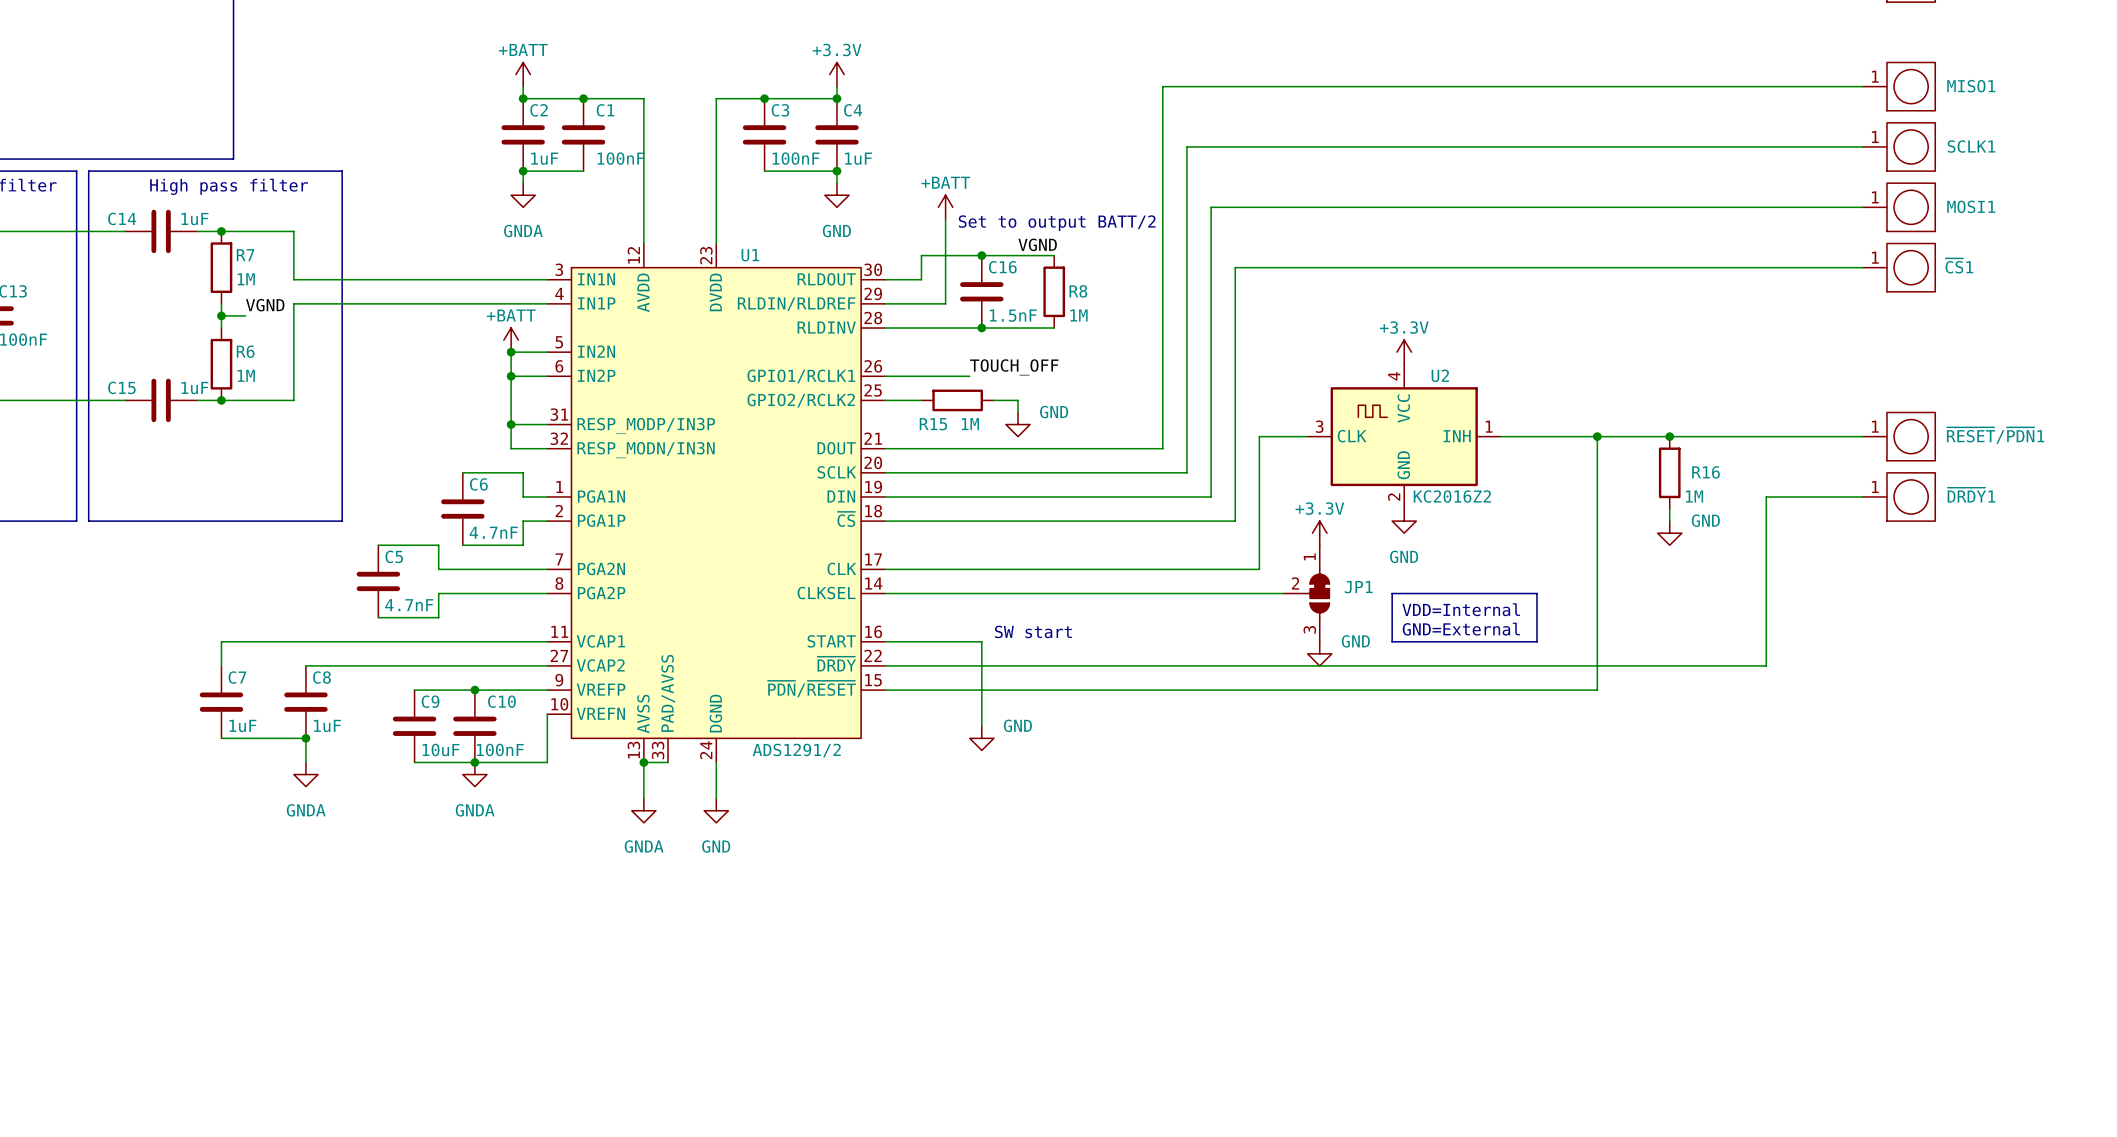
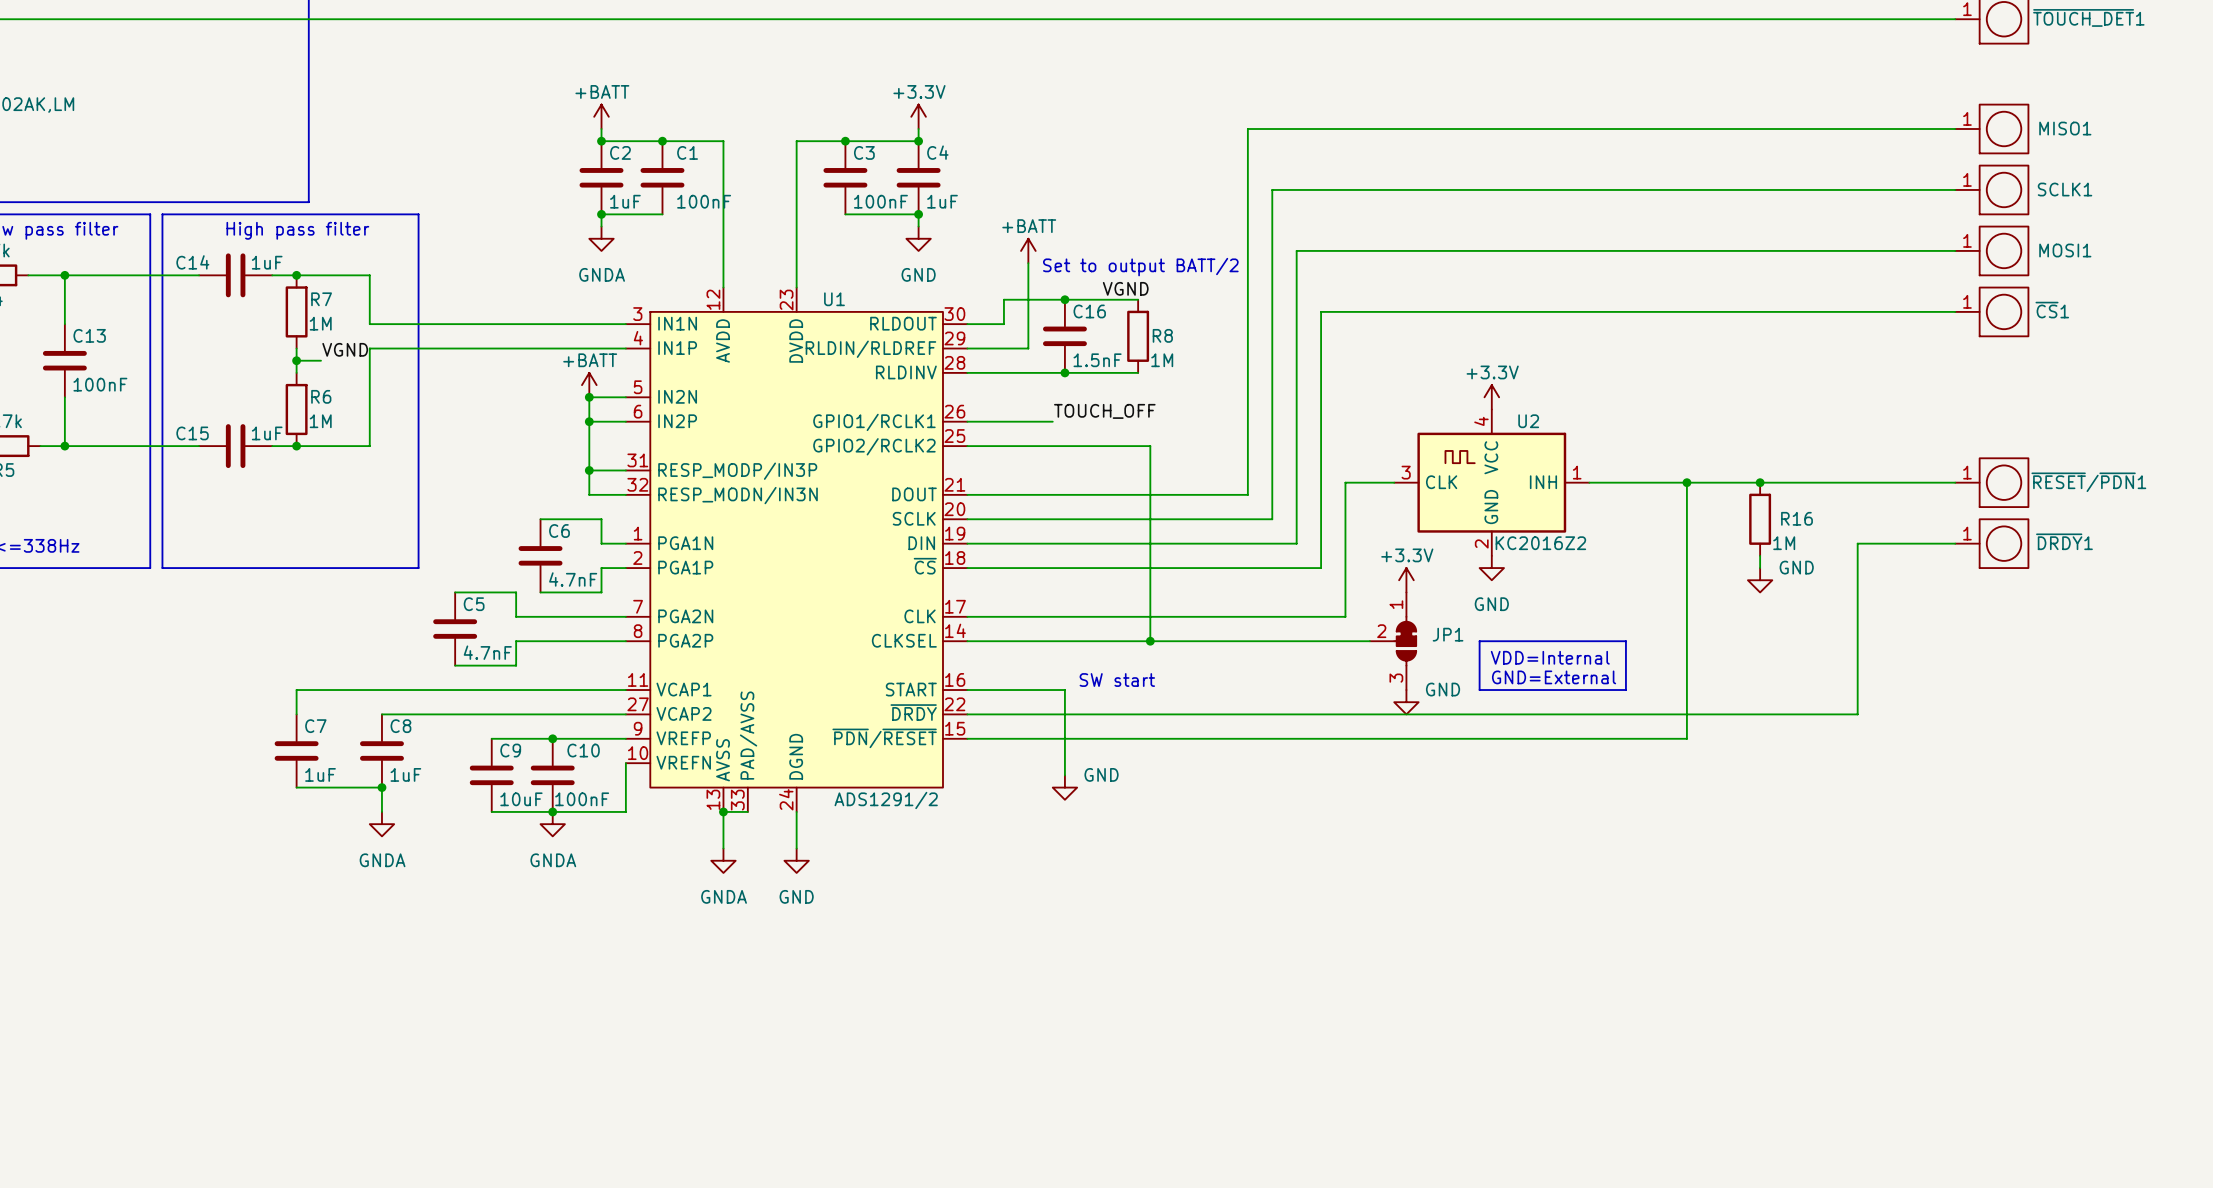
wire: none -> (1003, 446) (1077, 446)
R15: 1M (957, 400) -> none
wire: (1018, 400) (1018, 412) -> (1101, 446) (1150, 446) (1150, 641)
power symbol: GND (1018, 424) -> none
junction: none -> (1150, 641)

